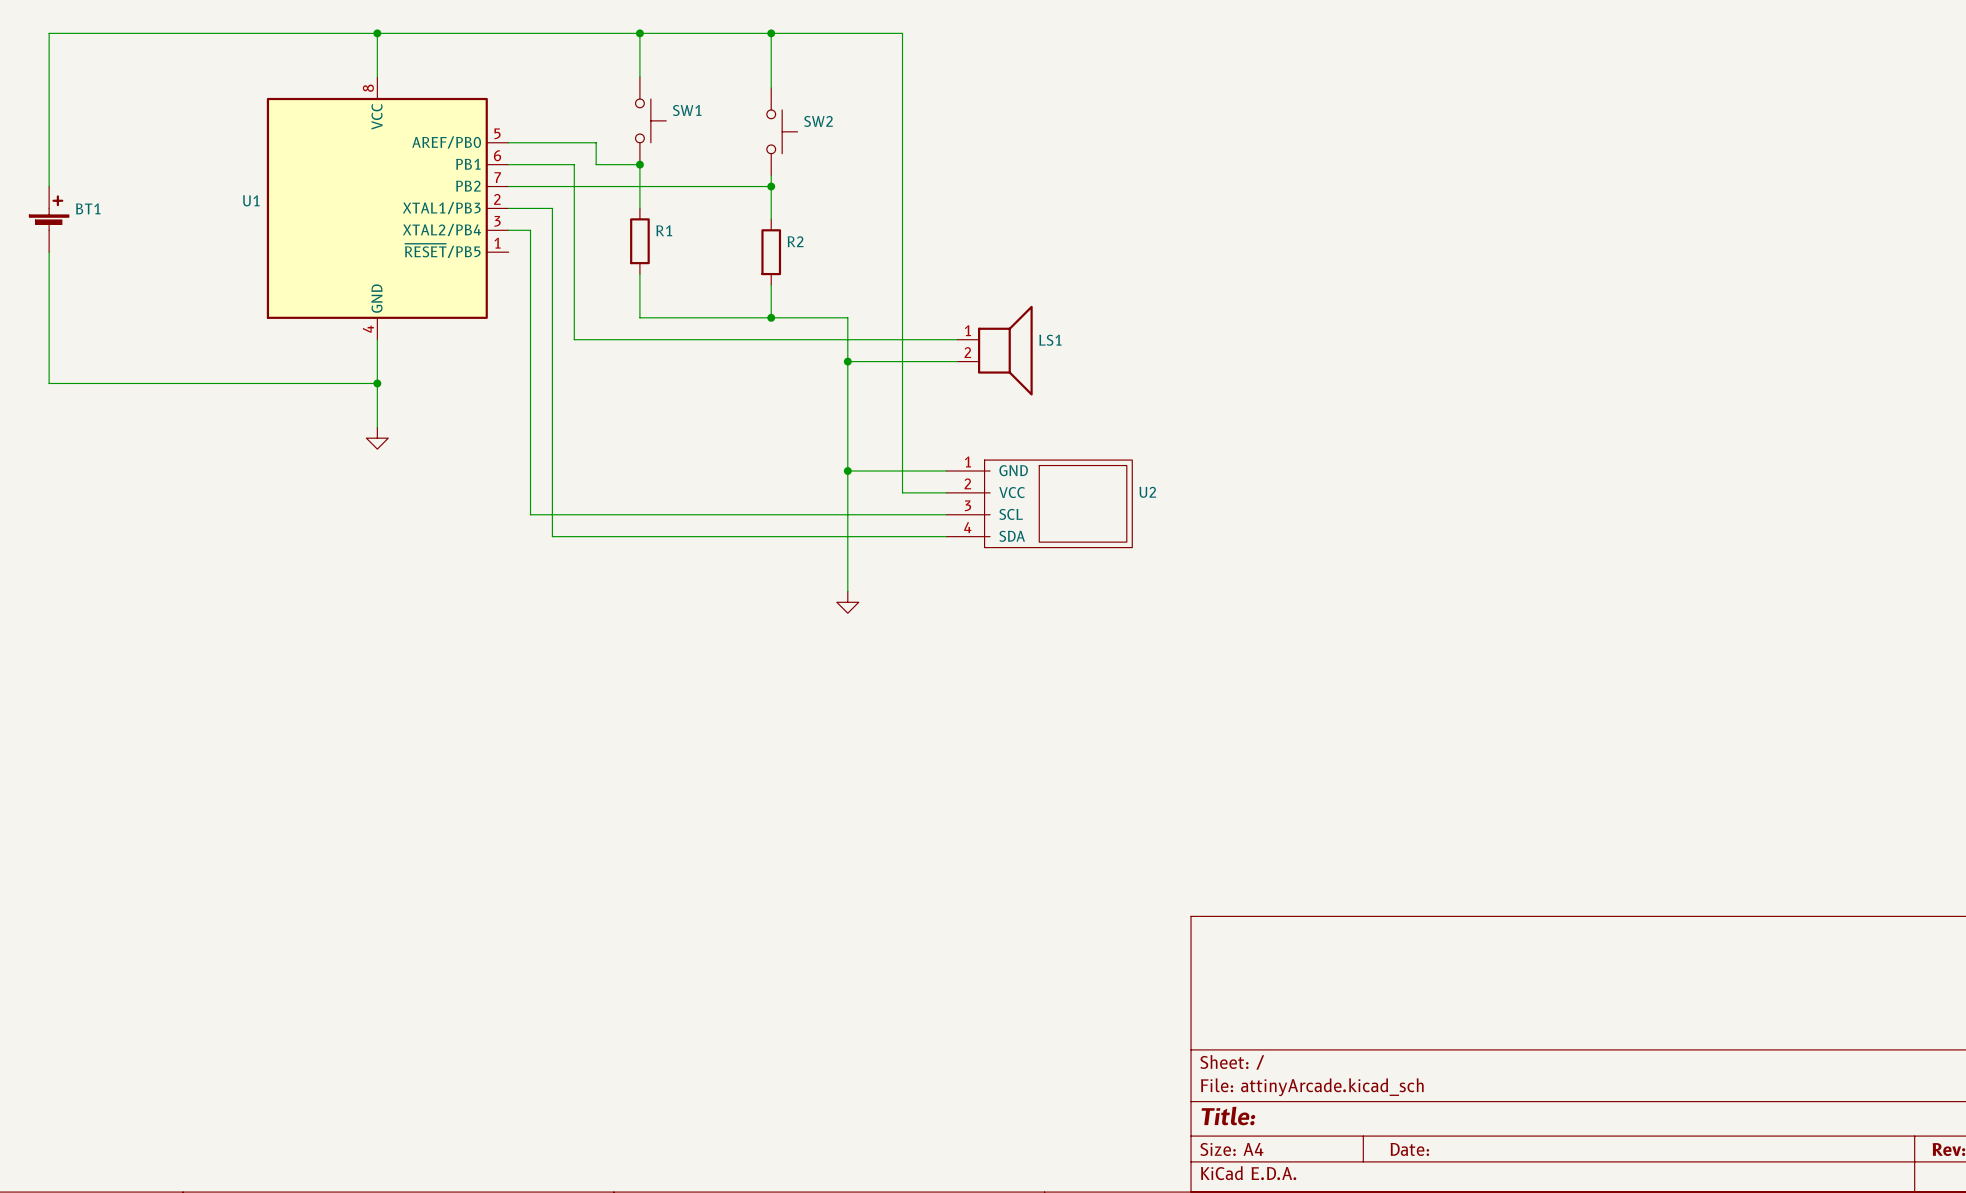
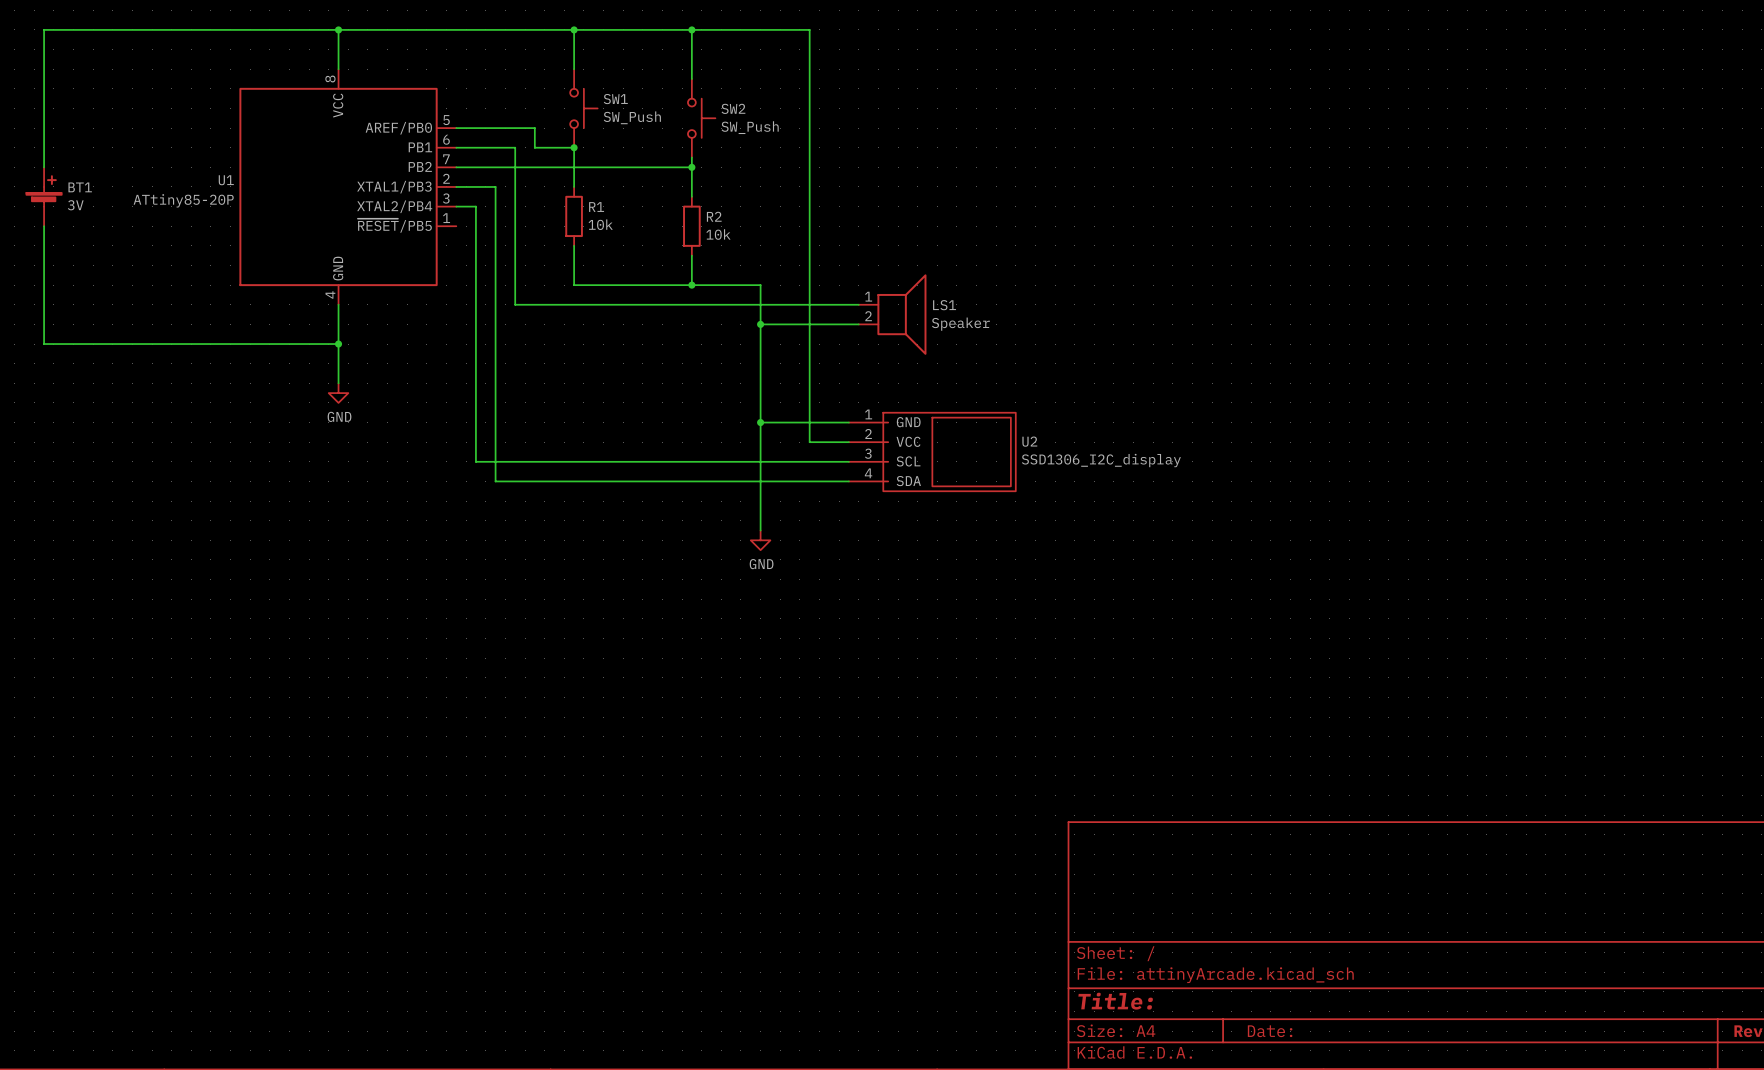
SW1 value: none -> SW_Push (632, 117)
SW2 value: none -> SW_Push (750, 127)
U1 value: none -> ATtiny85-20P (183, 200)
BT1 value: none -> 3V (75, 205)
R1 value: none -> 10k (600, 224)
R2 value: none -> 10k (718, 234)
LS1 value: none -> Speaker (960, 324)
power symbol text: none -> GND (339, 416)
U2 value: none -> SSD1306_I2C_display (1101, 460)
power symbol text: none -> GND (761, 564)

